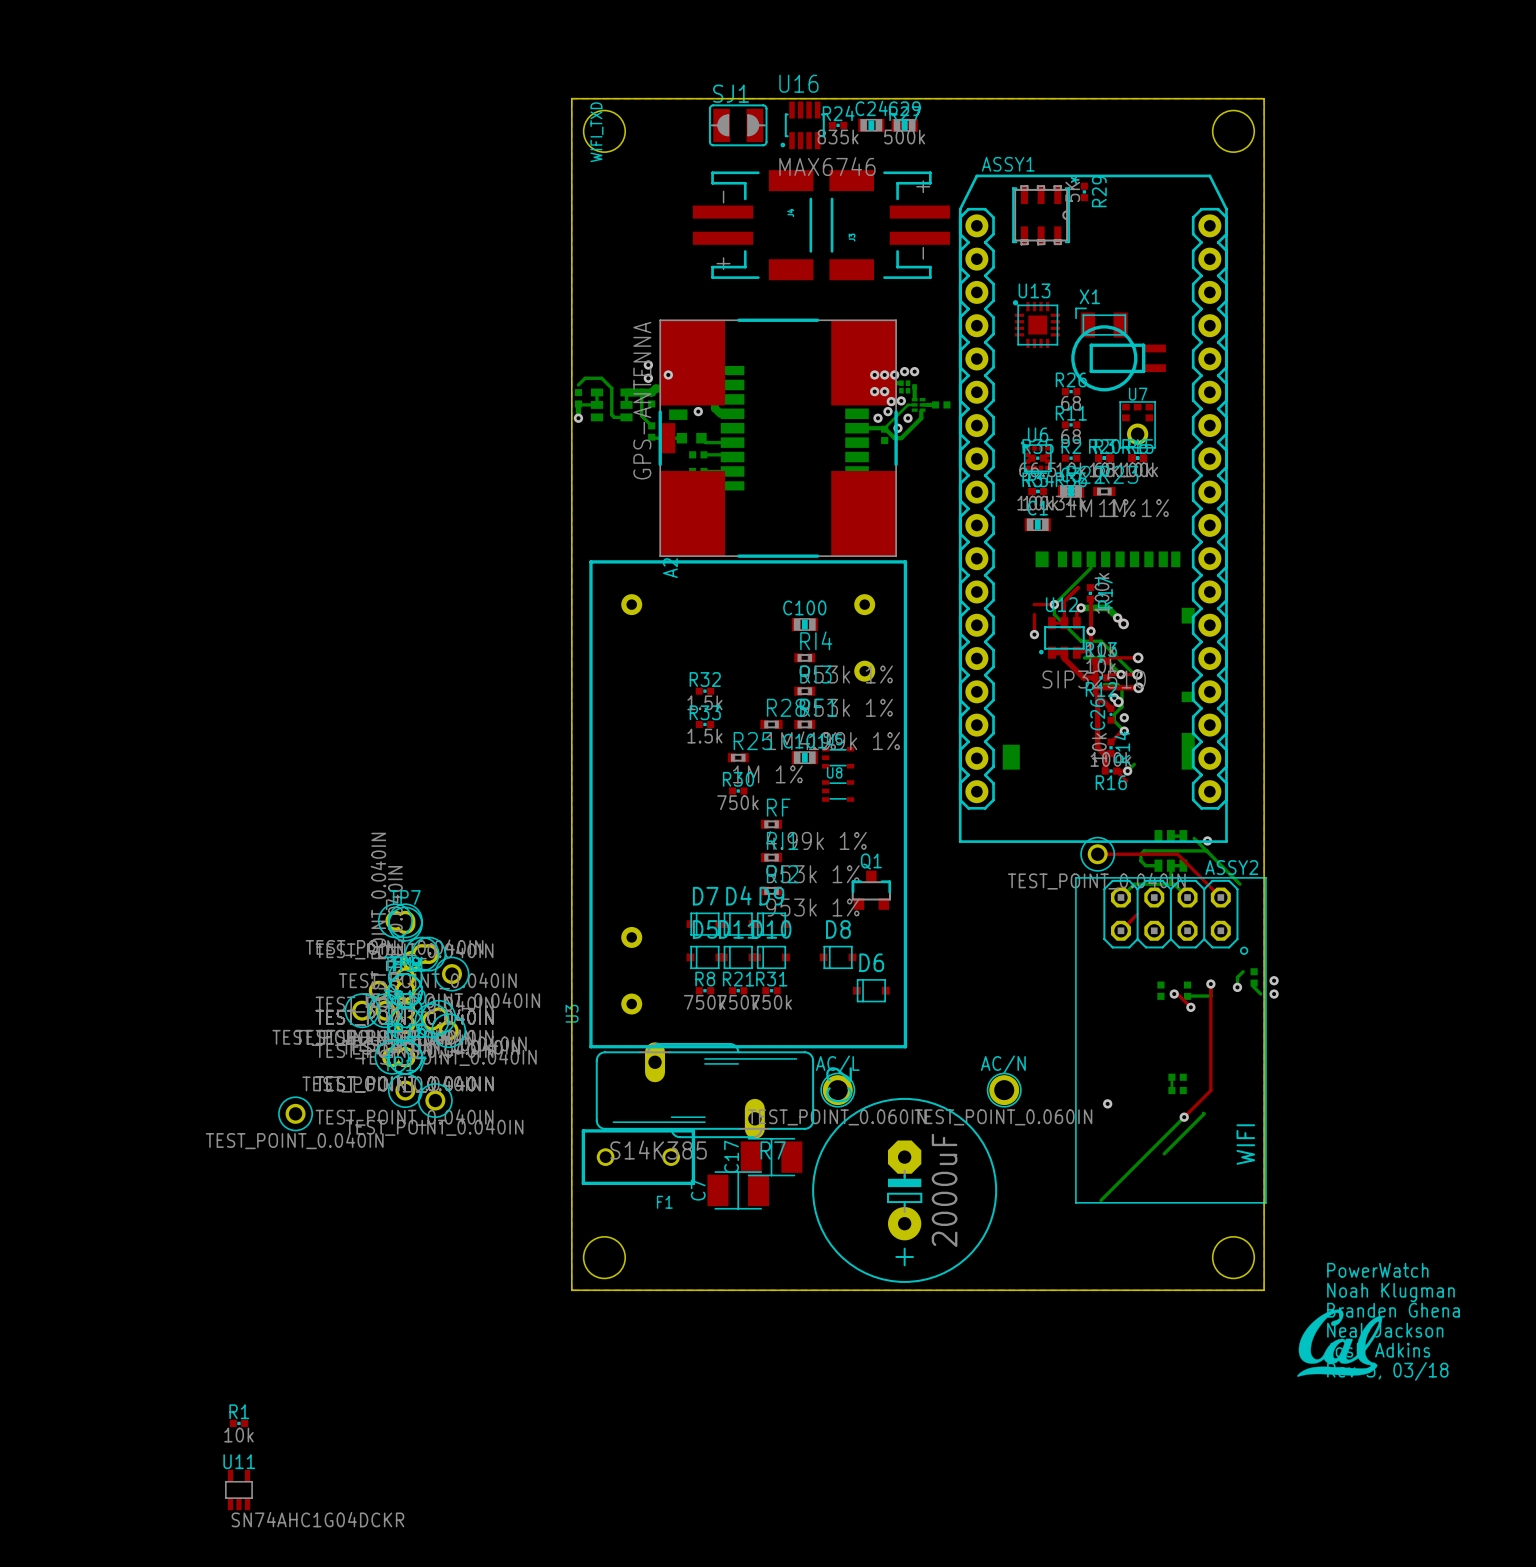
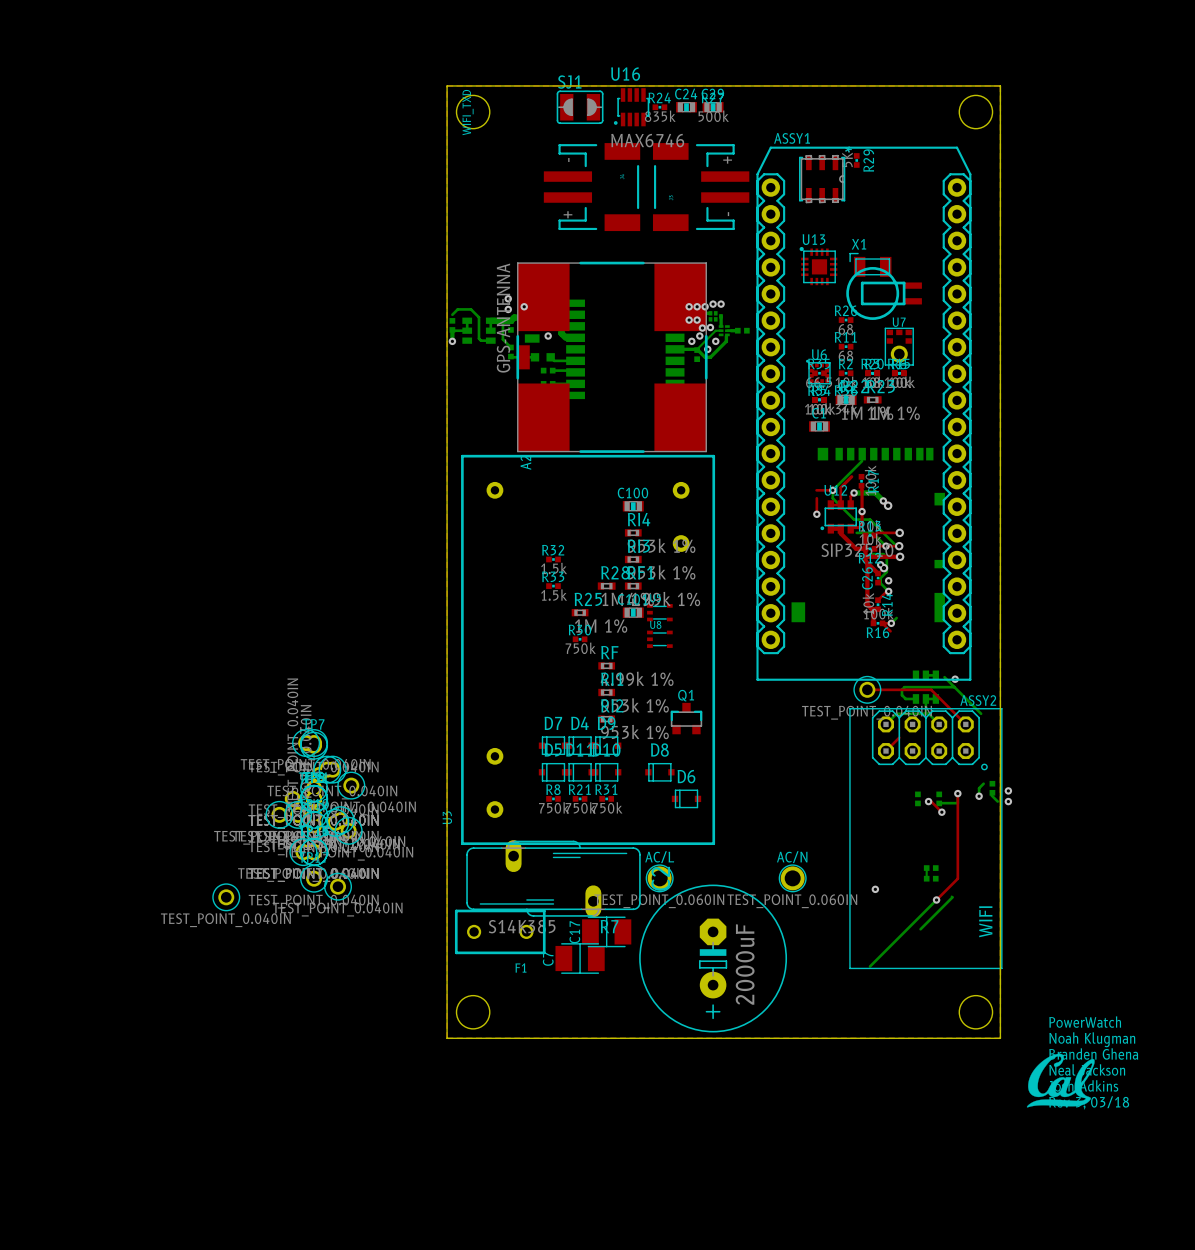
R1: 10k (238, 1423) -> none
U11: SN74AHC1G04DCKR (238, 1489) -> none

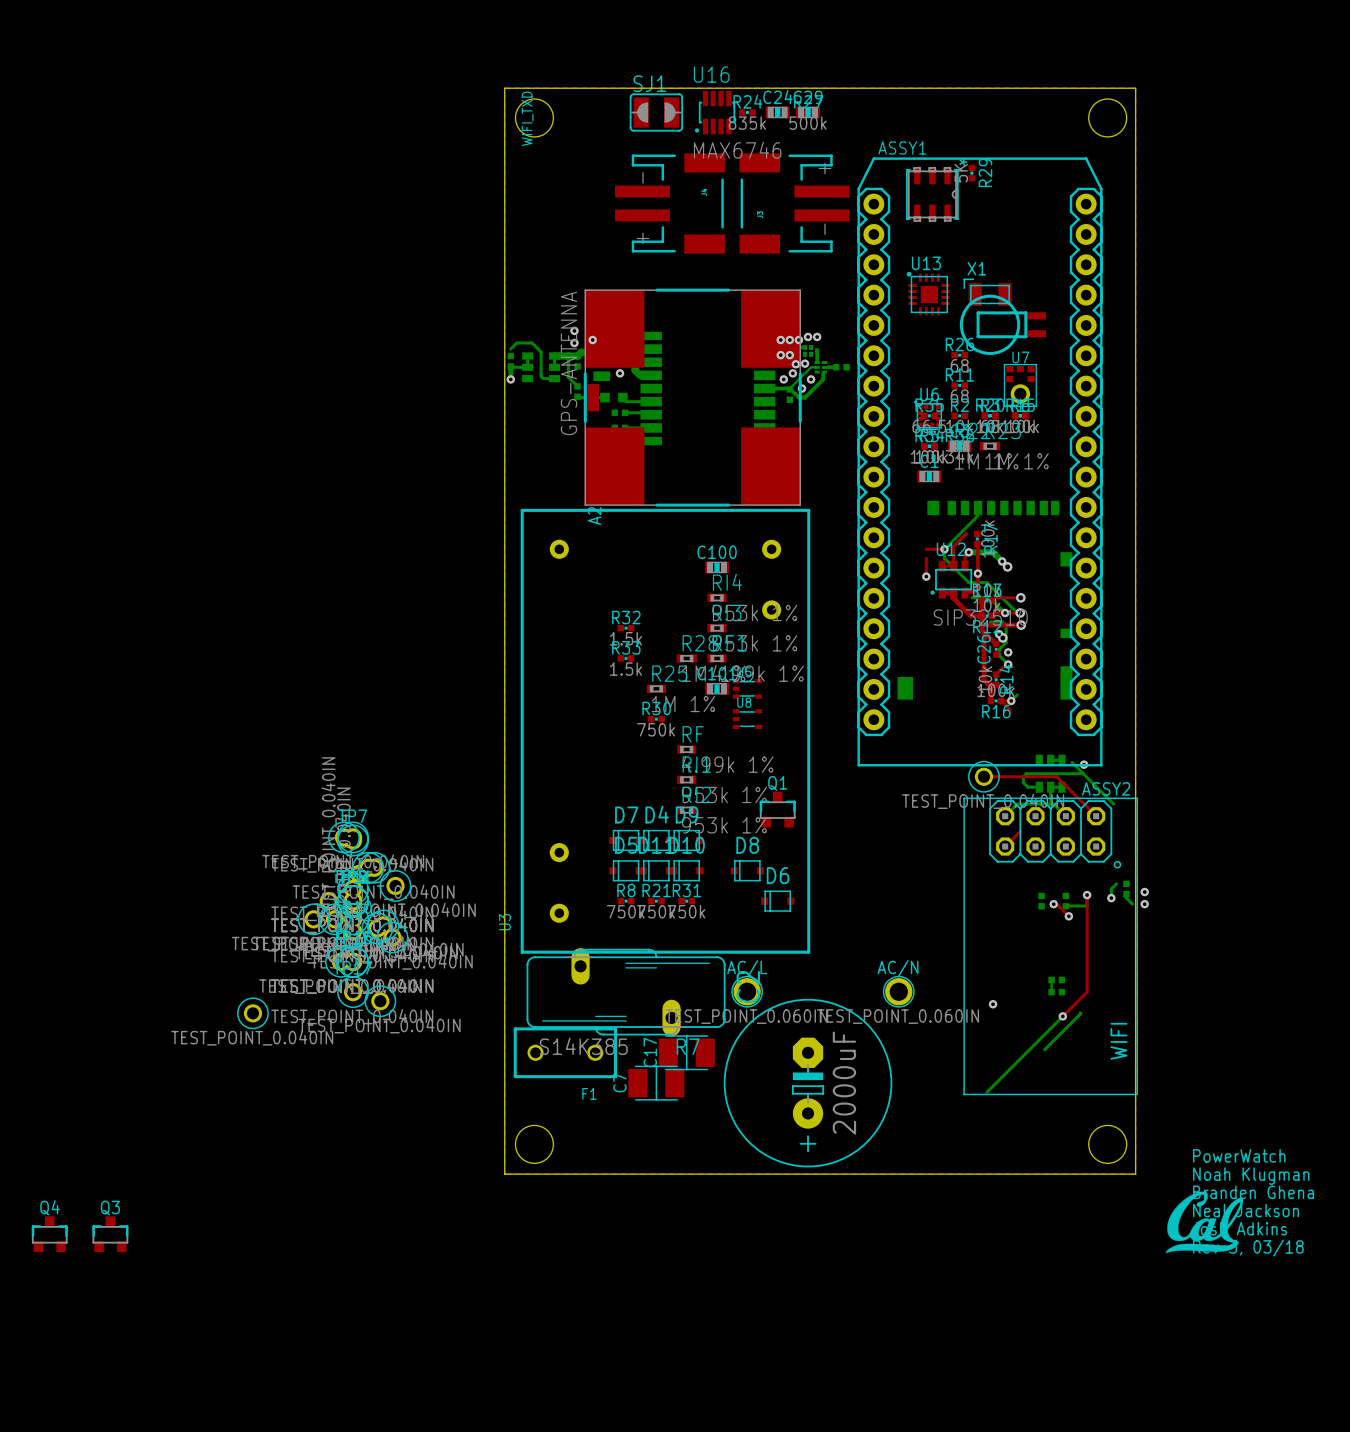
Q4: none -> (49, 1234)
Q3: none -> (110, 1234)

